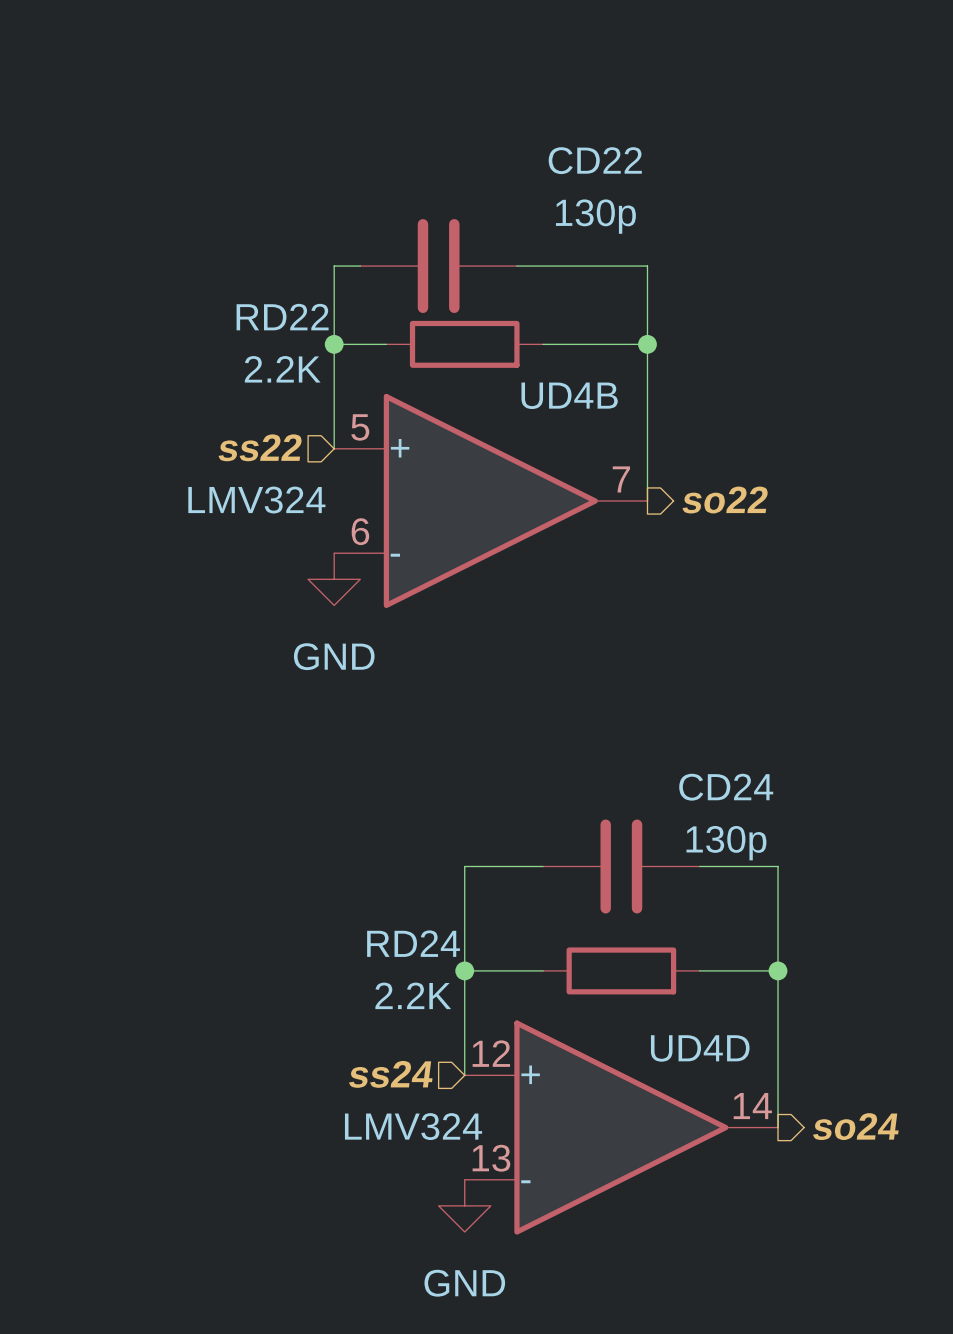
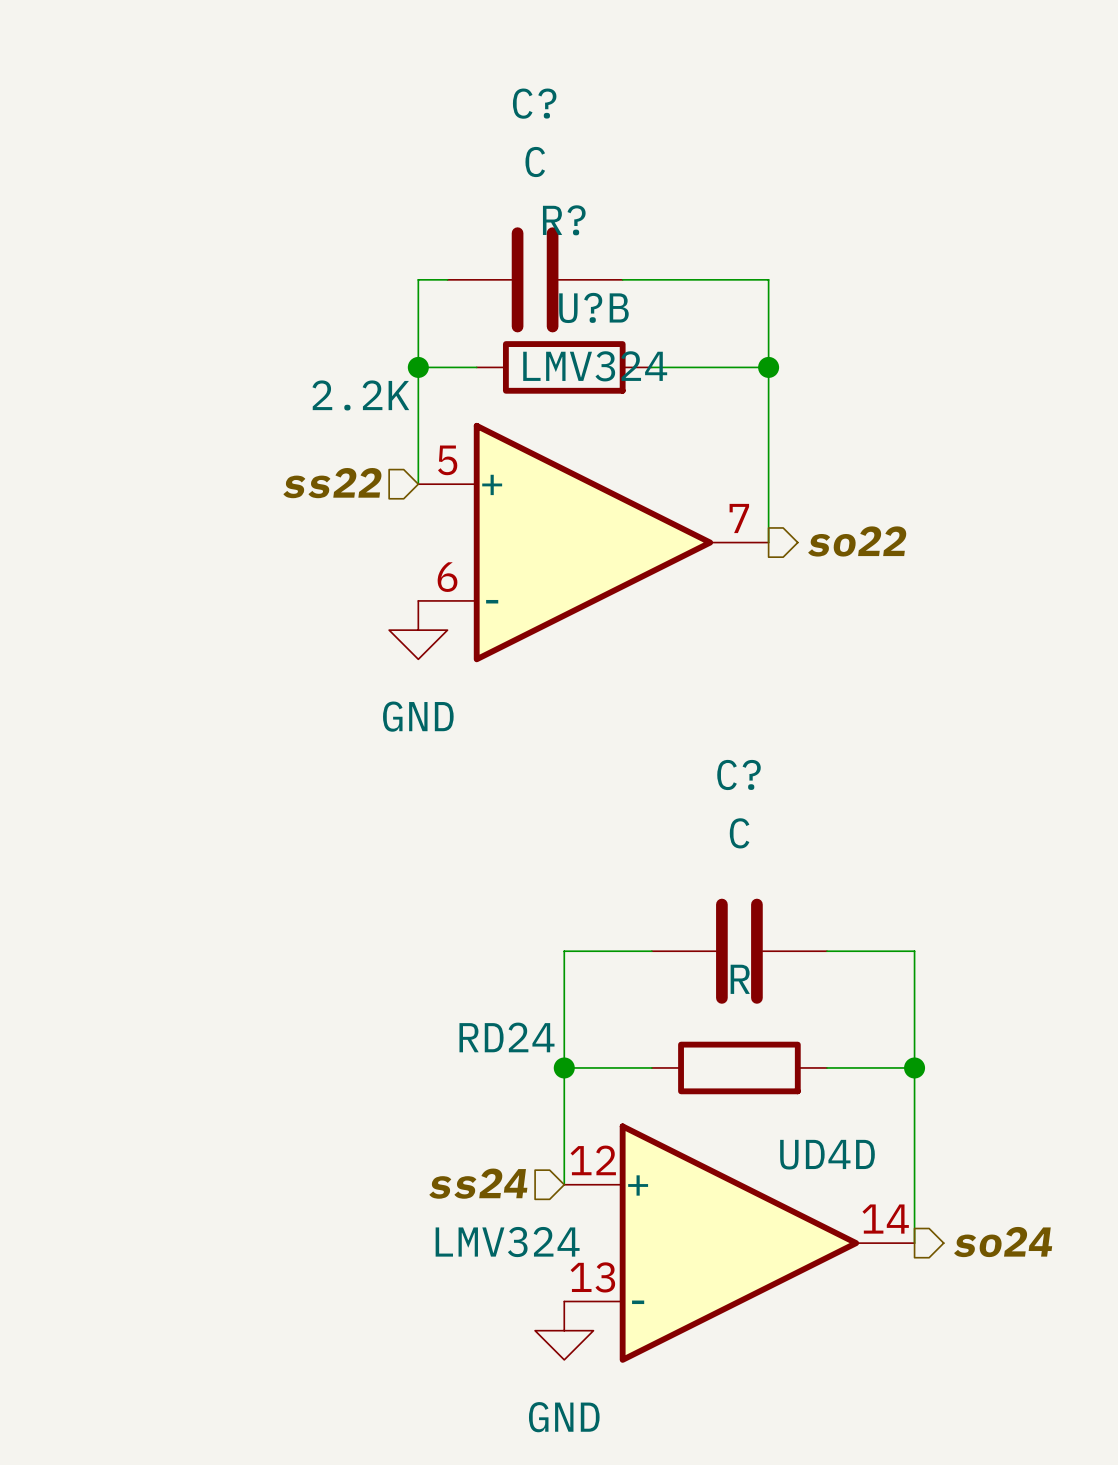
CD22 name: CD22 (595, 160) -> C? (534, 103)
CD22 value: 130p (595, 216) -> C (535, 162)
RD22 name: RD22 (282, 317) -> R? (564, 220)
UD4B name: UD4B (569, 395) -> U?B (593, 307)
UD4B value position: LMV324 (256, 500) -> LMV324 (595, 366)
CD24 name: CD24 (726, 787) -> C? (739, 774)
CD24 value: 130p (726, 843) -> C (739, 833)
RD24 value: 2.2K (413, 995) -> R (740, 979)

